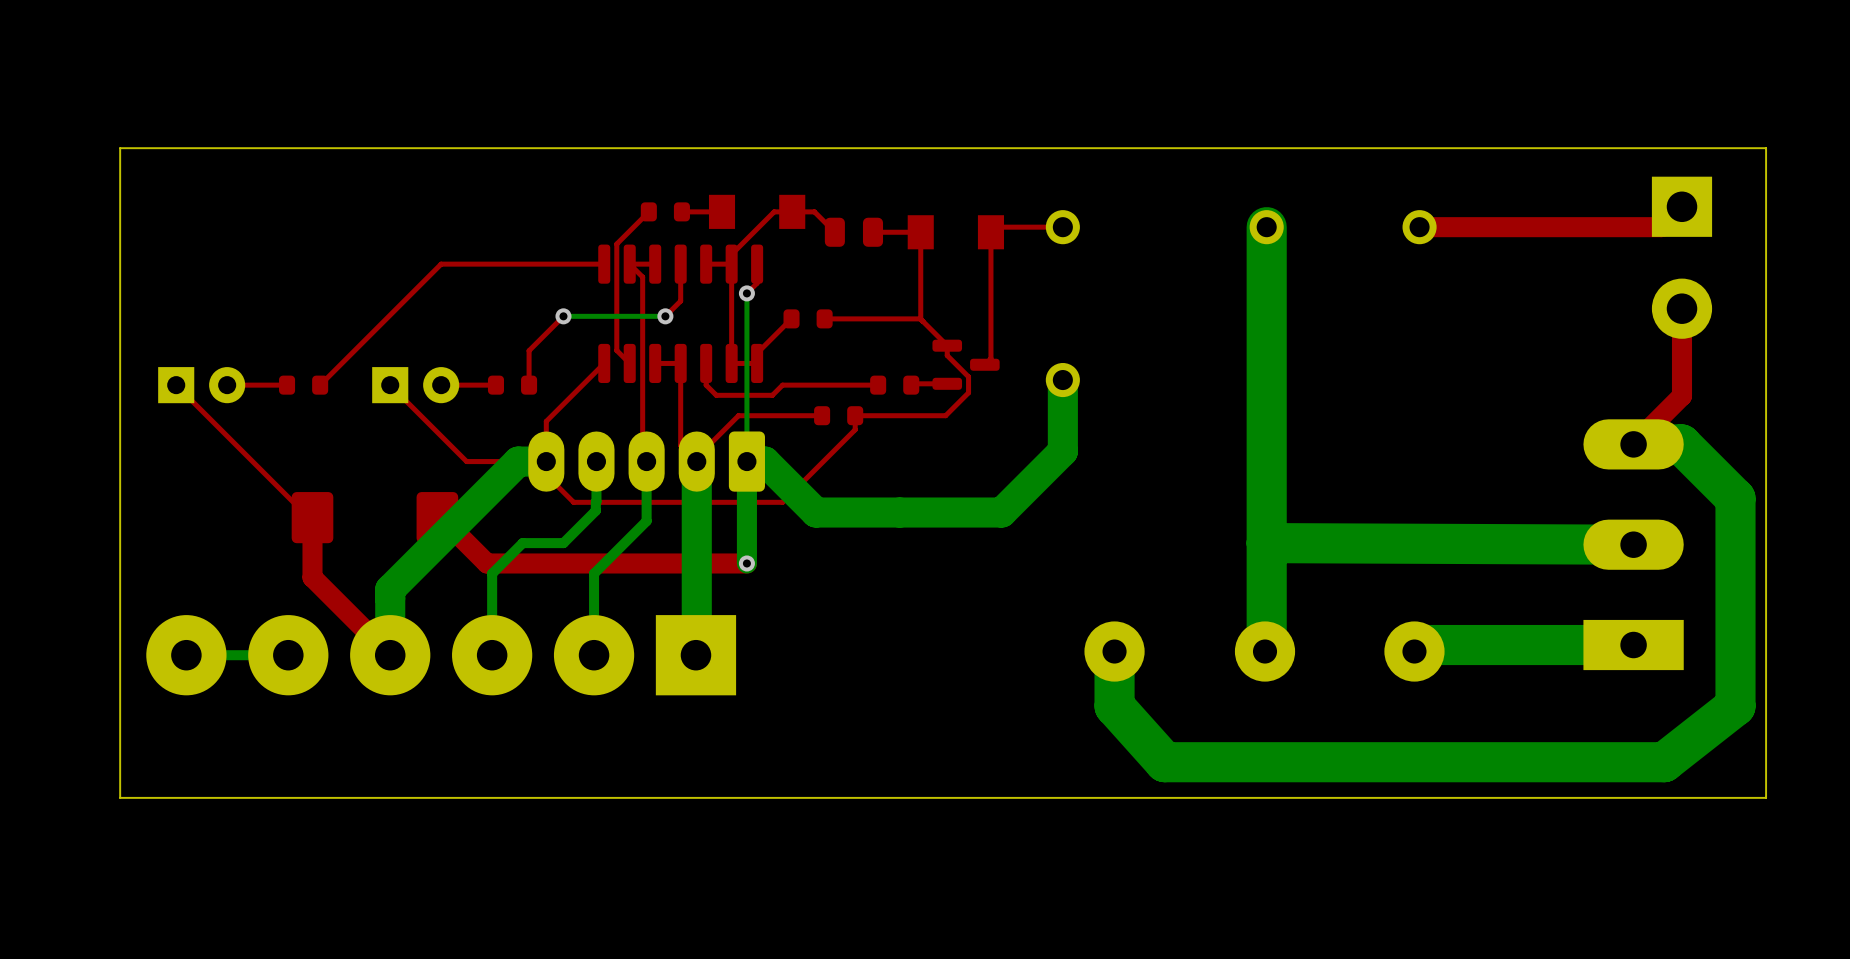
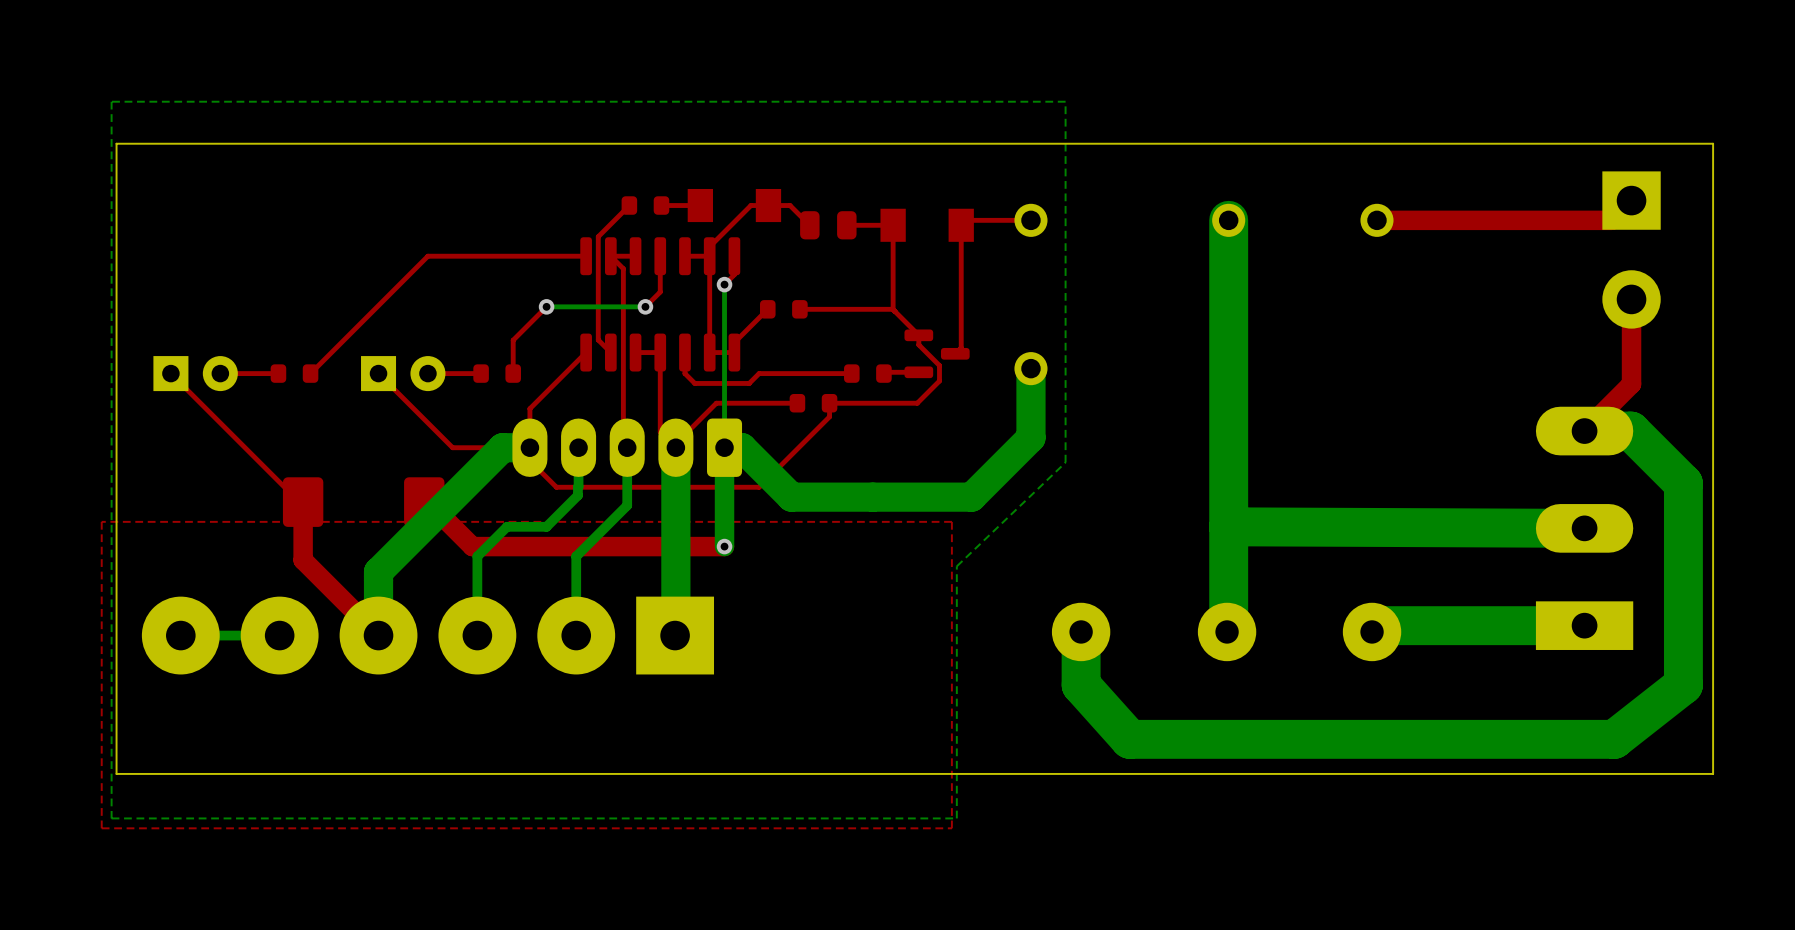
bottom zone outline: none -> (1065, 101) (1065, 462) (956, 566) (956, 818) (111, 818) (111, 101) (1065, 101)
top zone outline: none -> (951, 521) (951, 828) (101, 828) (101, 521) (951, 521)

